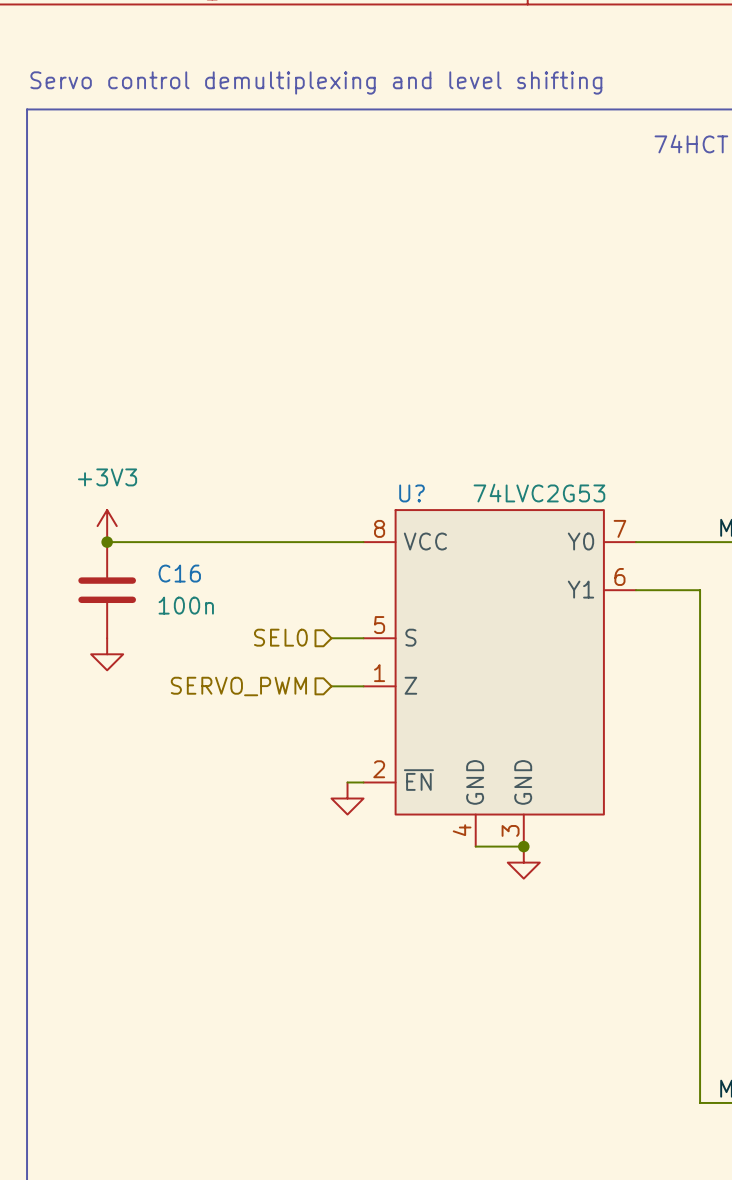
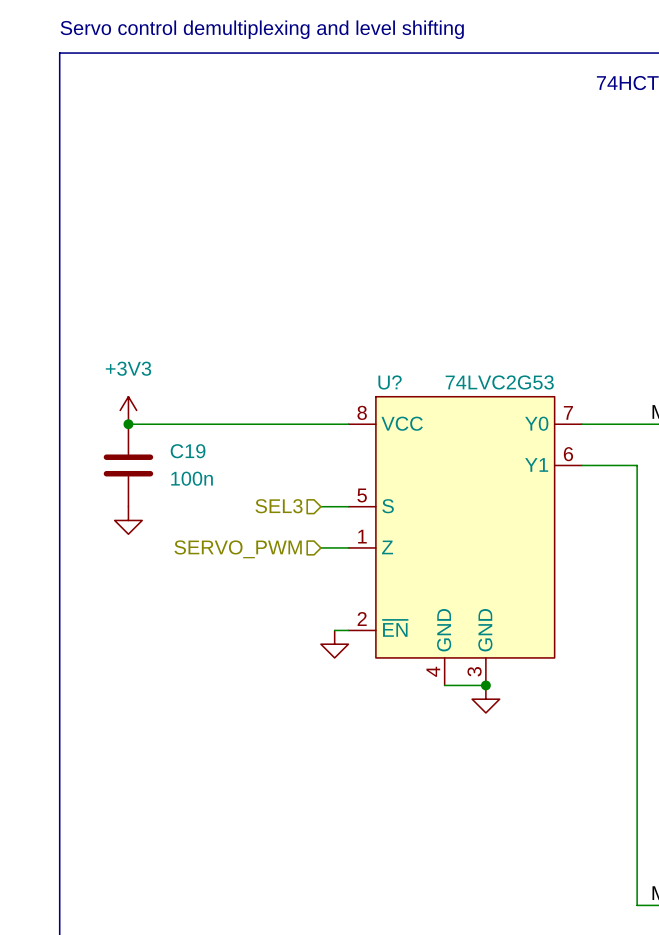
C16 name: C16 (179, 573) -> C19 (188, 451)
hierarchical label: SEL0 (280, 637) -> SEL3 (279, 506)

